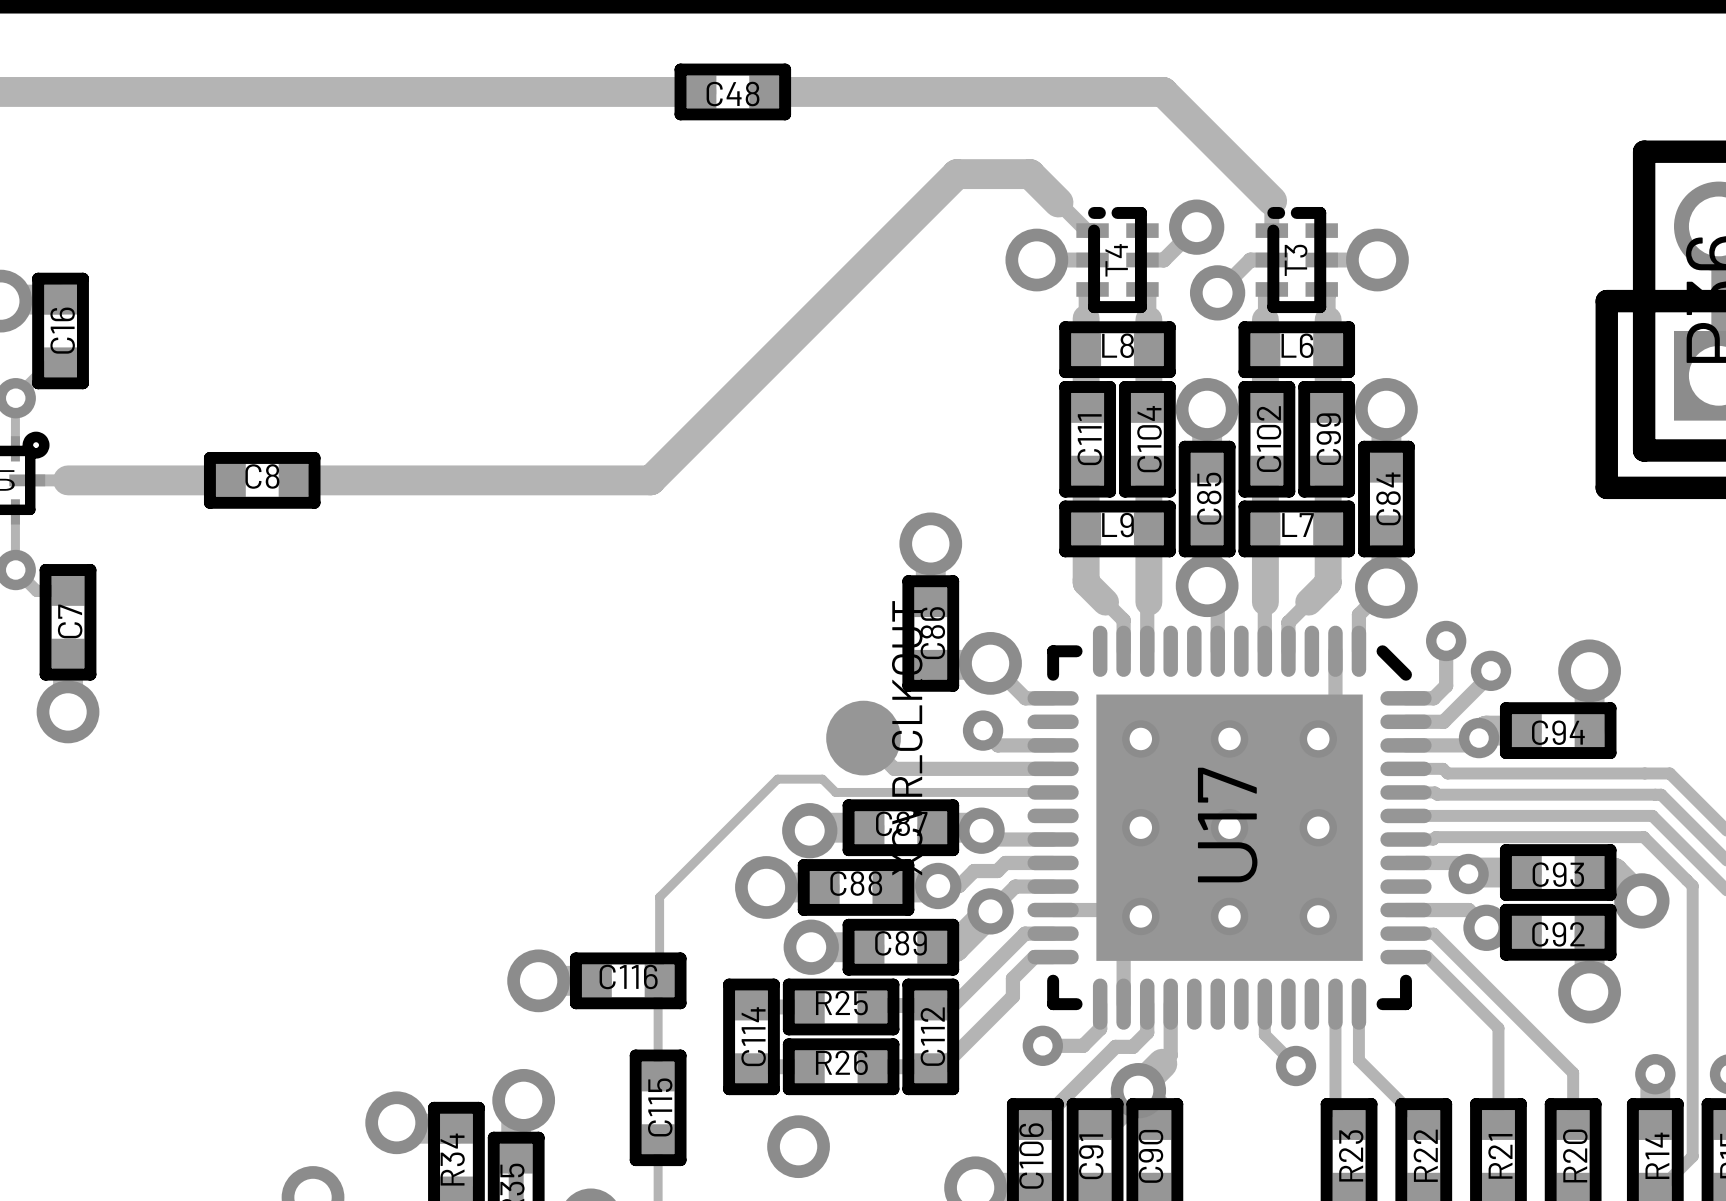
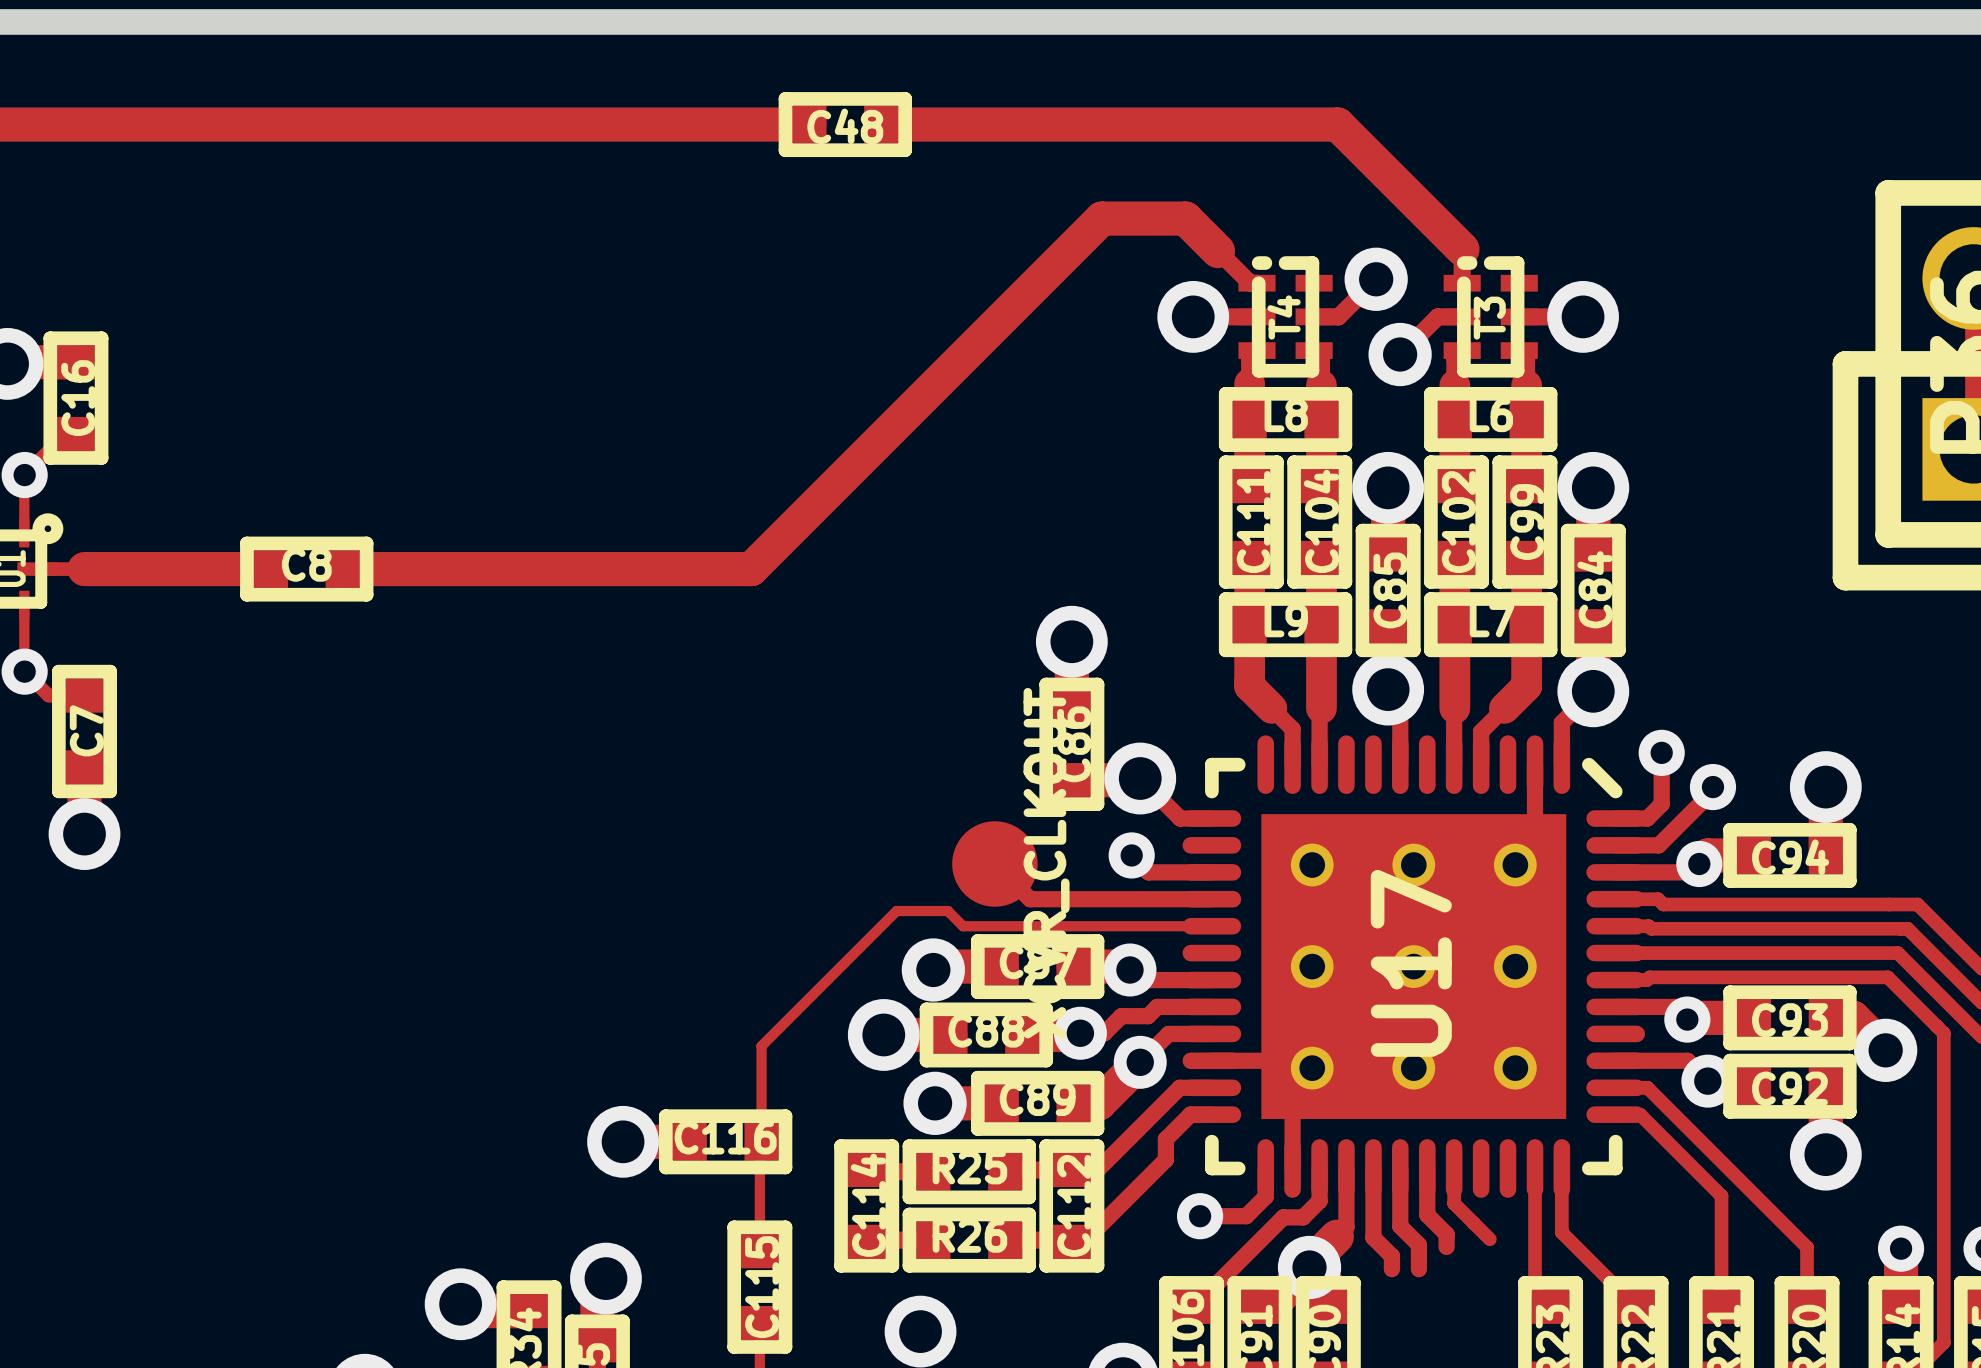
track: none -> (1373, 1168) (1373, 1237) (1391, 1256) (1391, 1269)
track: none -> (1400, 1168) (1400, 1226) (1418, 1244) (1418, 1269)
track: none -> (1427, 1168) (1427, 1215) (1446, 1234) (1446, 1246)
via: (1296, 1065) -> none

